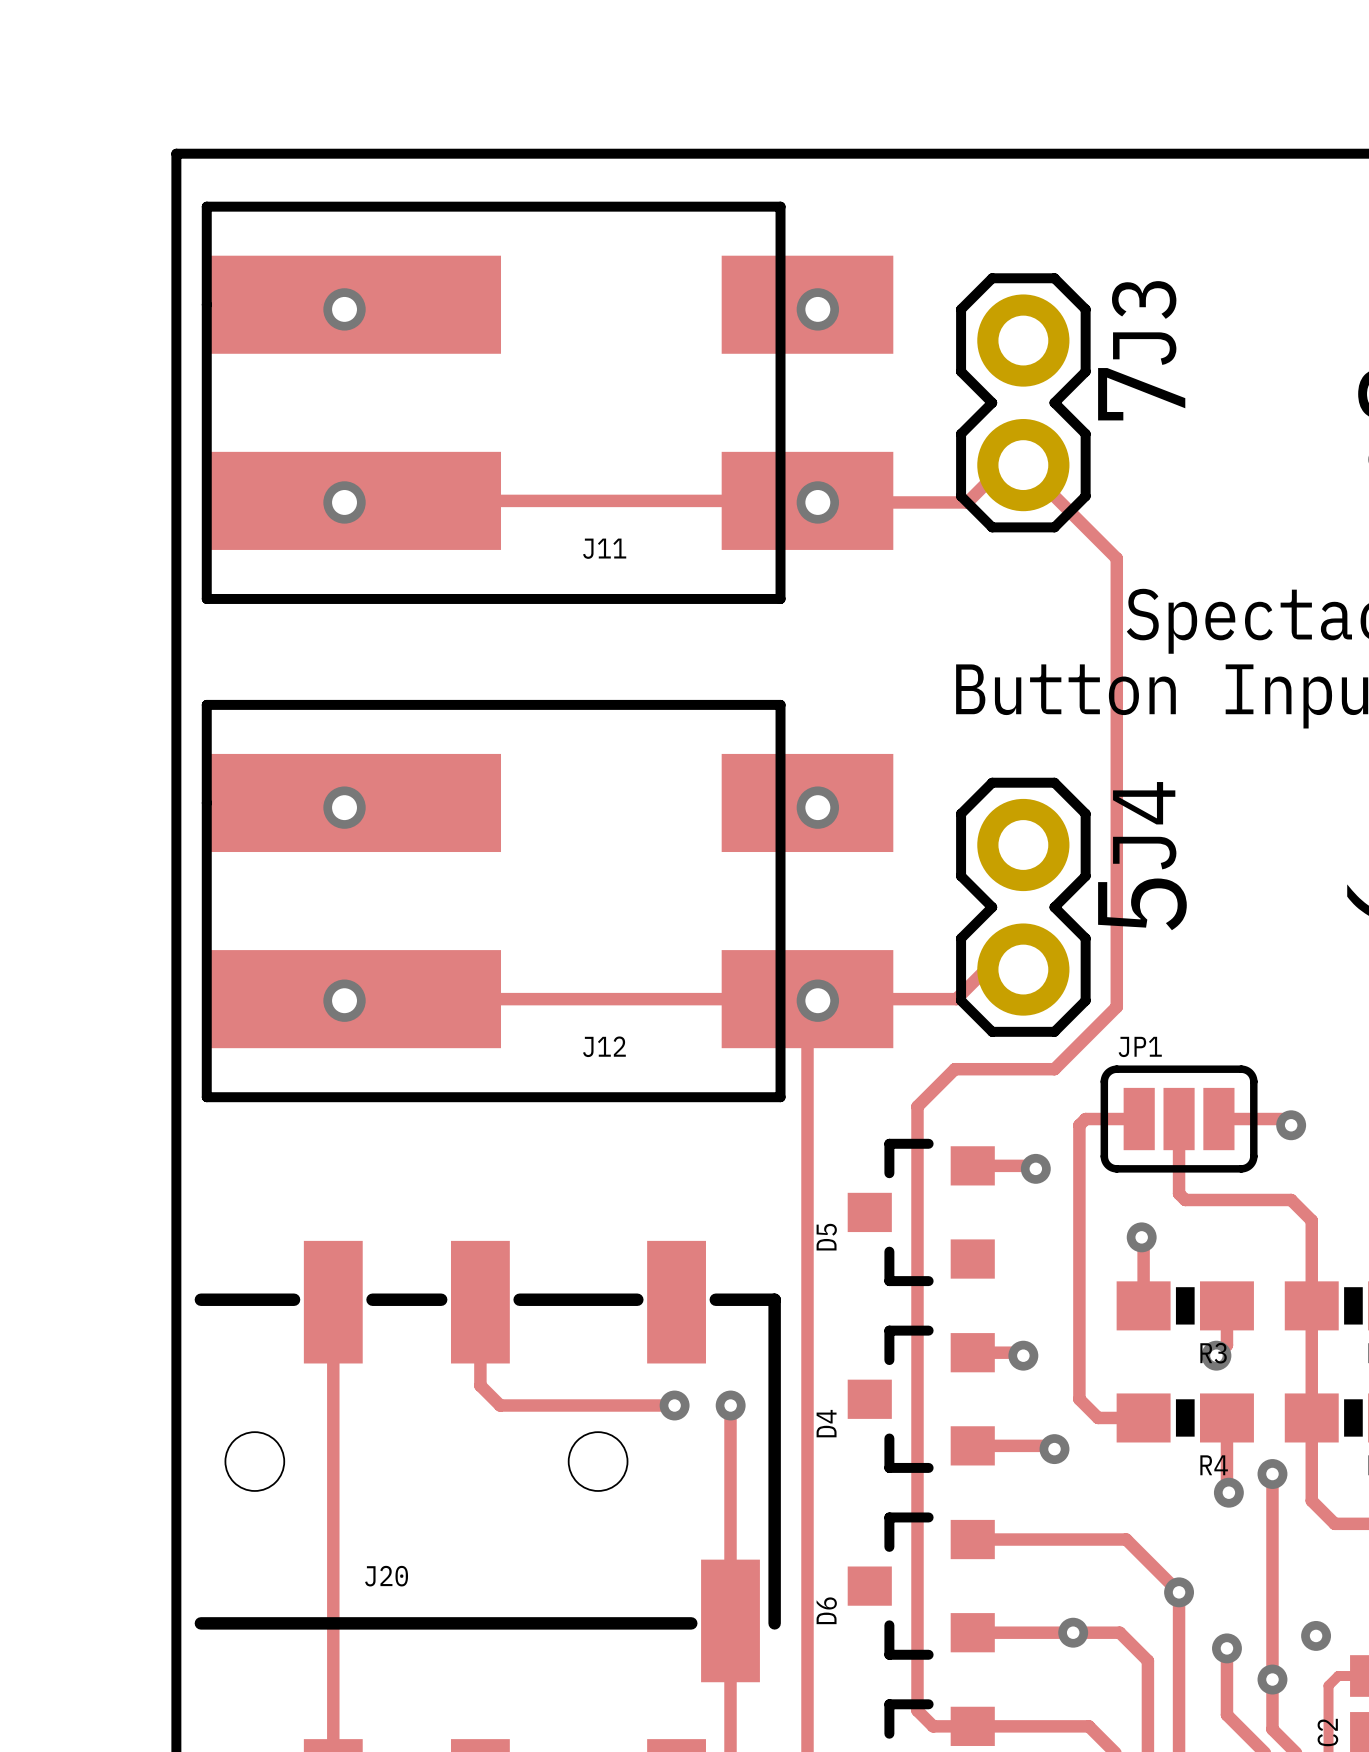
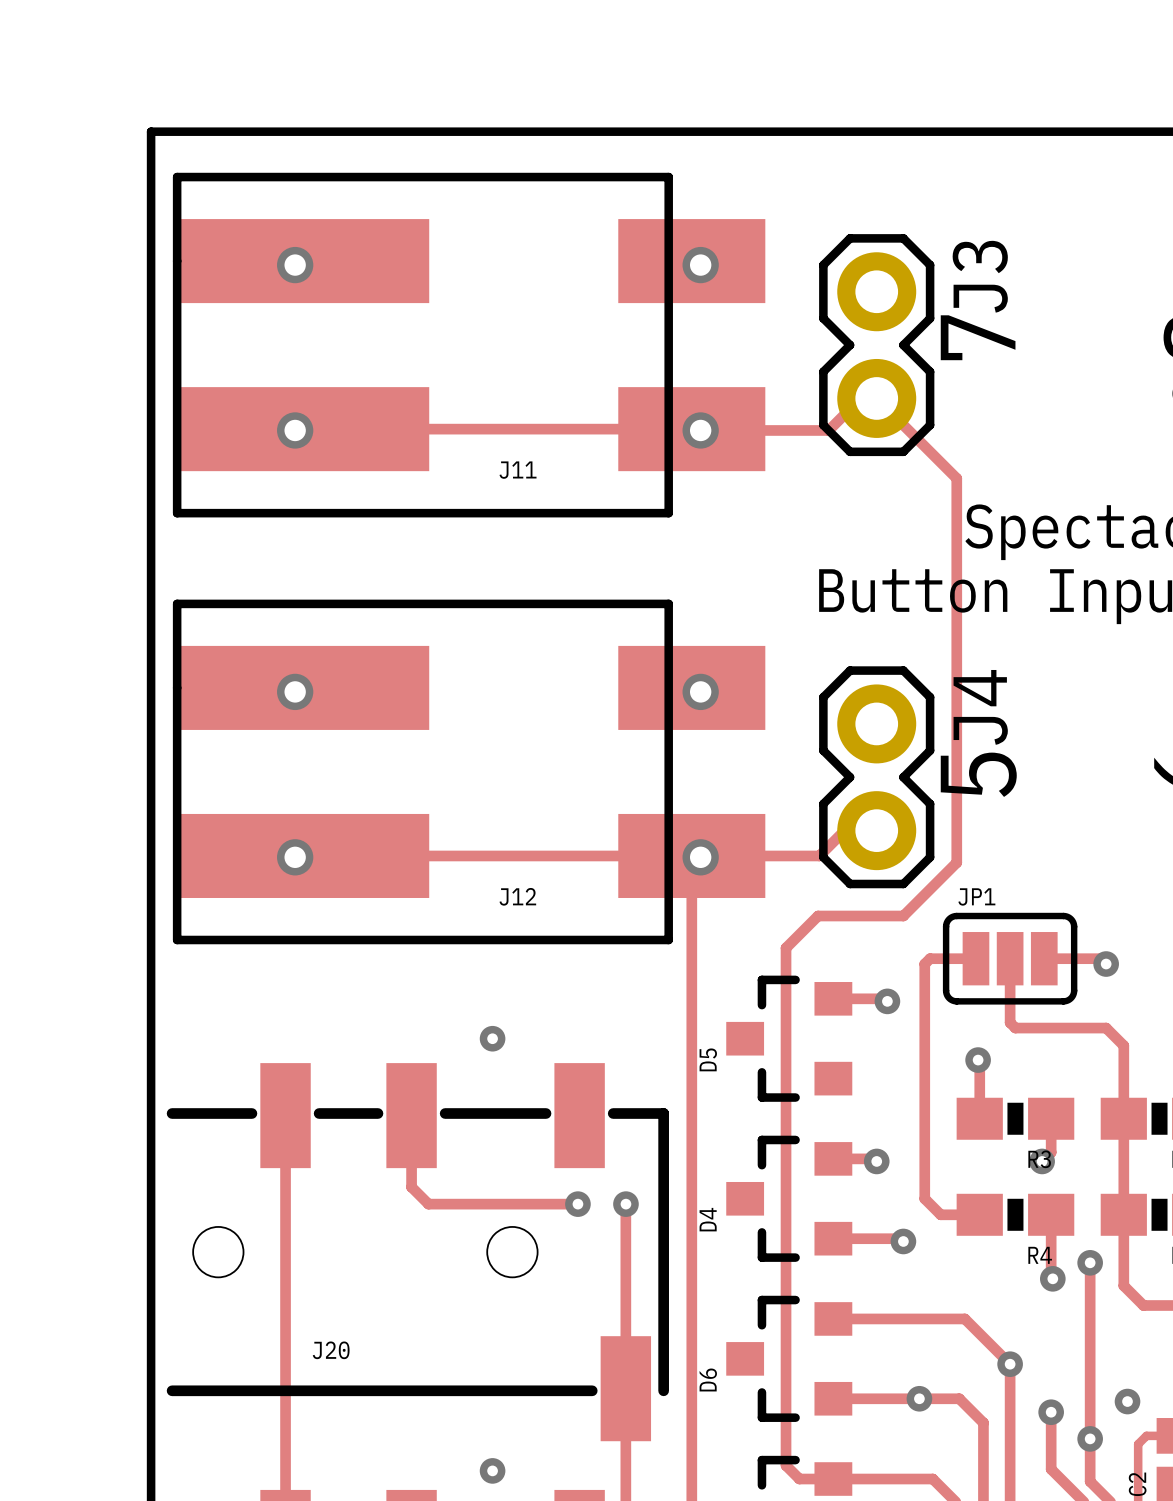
via: none -> (492, 1038)
via: none -> (492, 1470)

